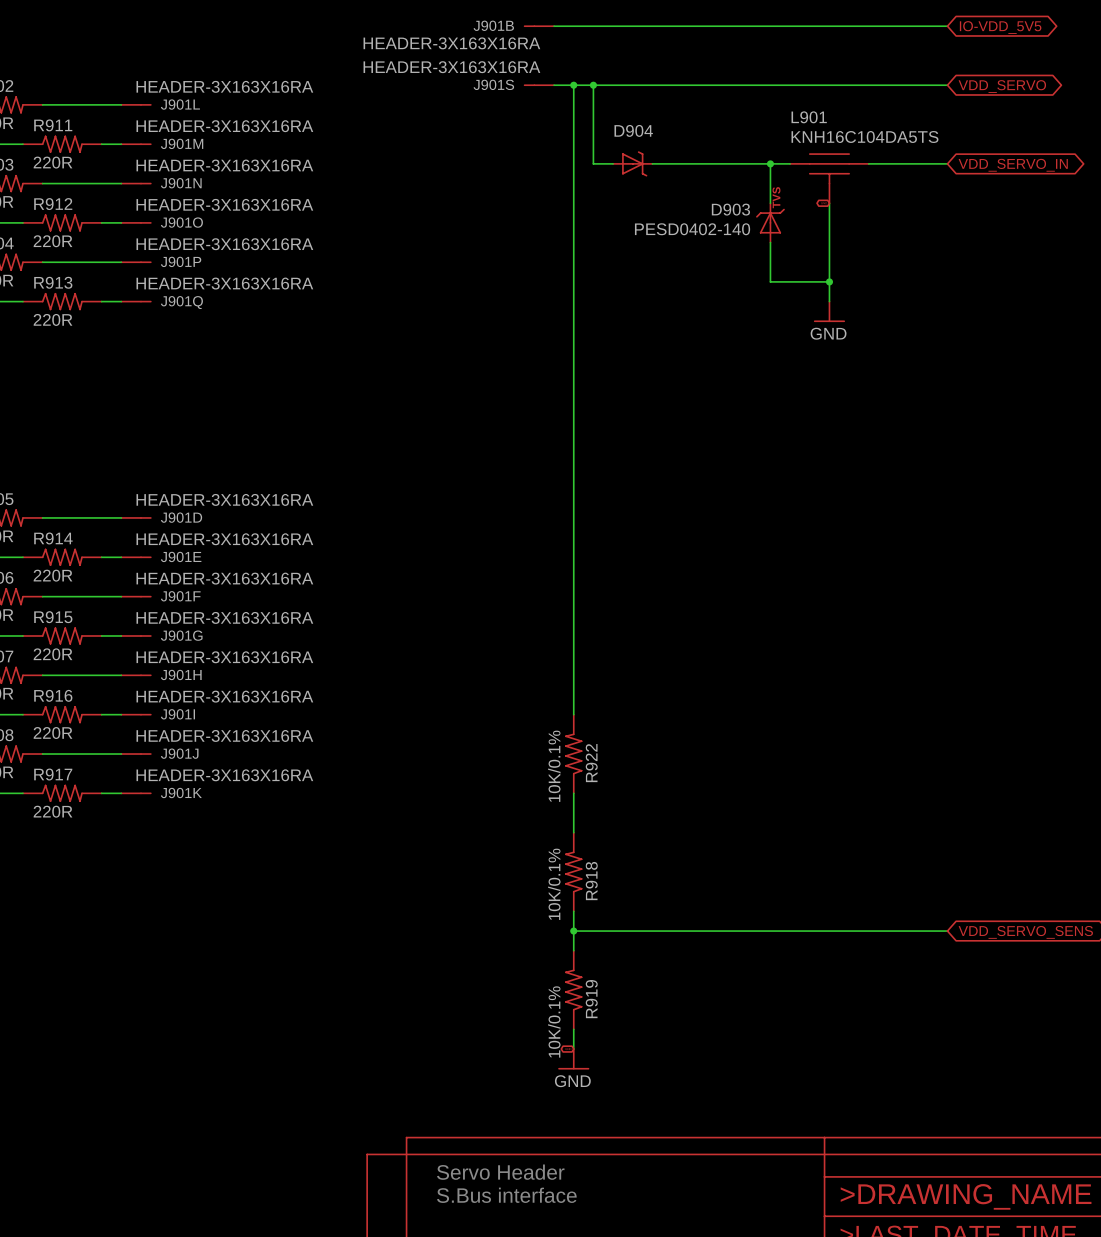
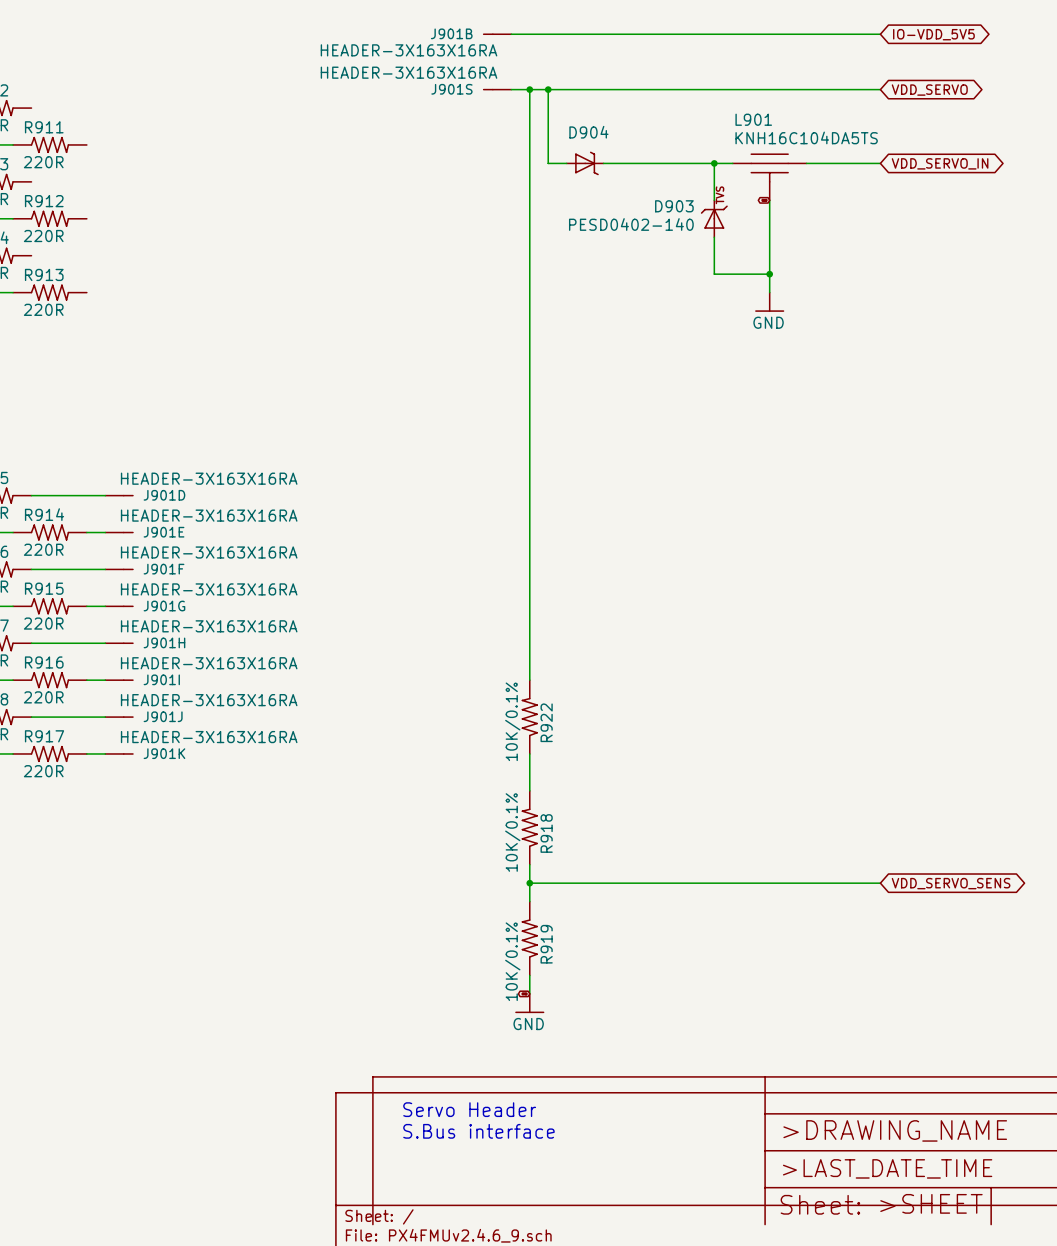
wire: (42, 104) (121, 104) -> none
J901L: HEADER-3X163X16RA (136, 104) -> none
wire: (101, 144) (121, 144) -> none
J901M: HEADER-3X163X16RA (136, 144) -> none
wire: (42, 183) (121, 183) -> none
J901N: HEADER-3X163X16RA (136, 183) -> none
wire: (101, 222) (121, 222) -> none
J901O: HEADER-3X163X16RA (136, 222) -> none
wire: (42, 262) (121, 262) -> none
J901P: HEADER-3X163X16RA (136, 262) -> none
wire: (101, 301) (121, 301) -> none
J901Q: HEADER-3X163X16RA (136, 301) -> none

